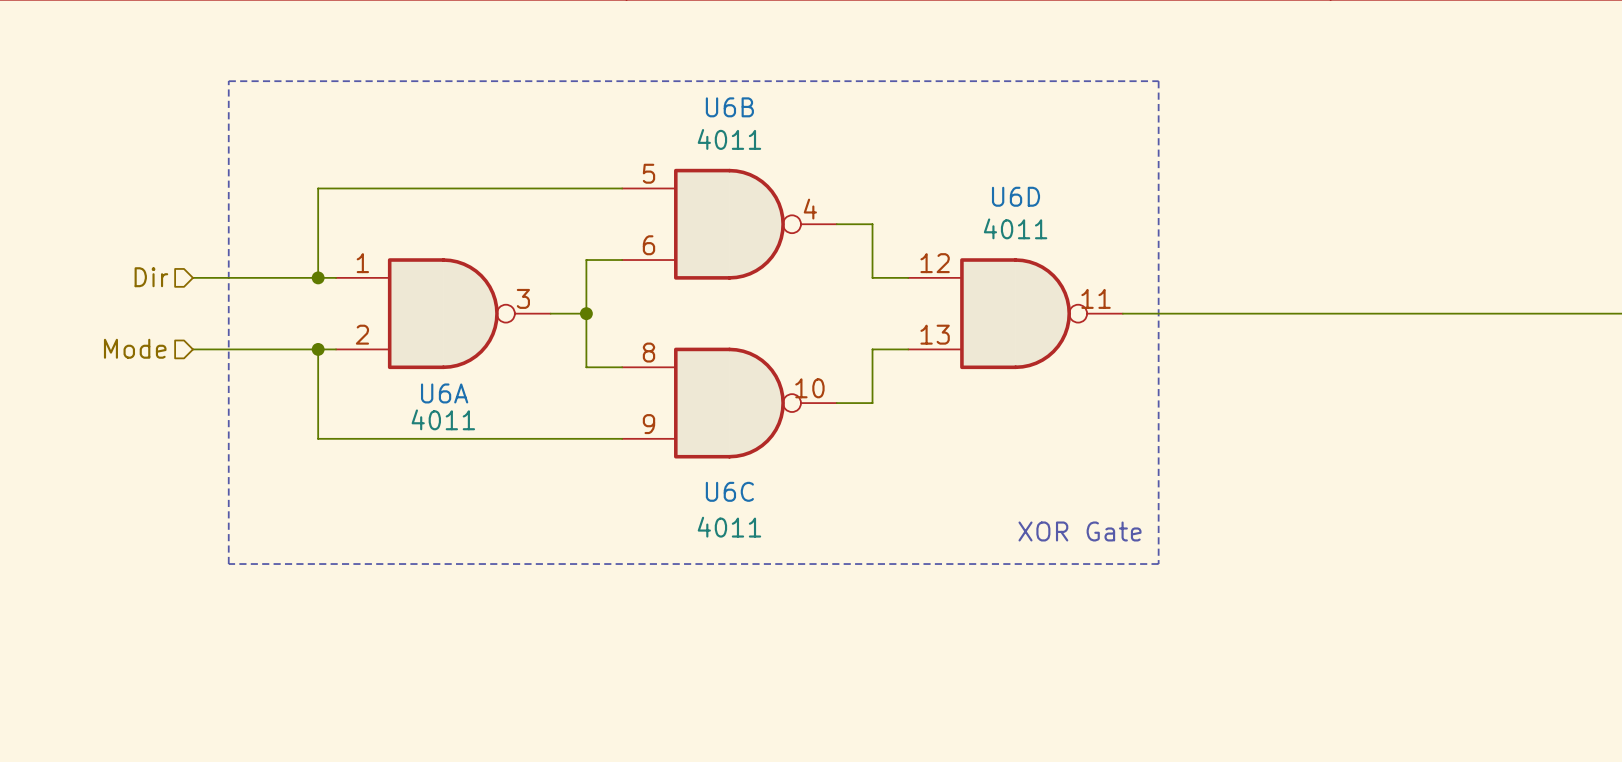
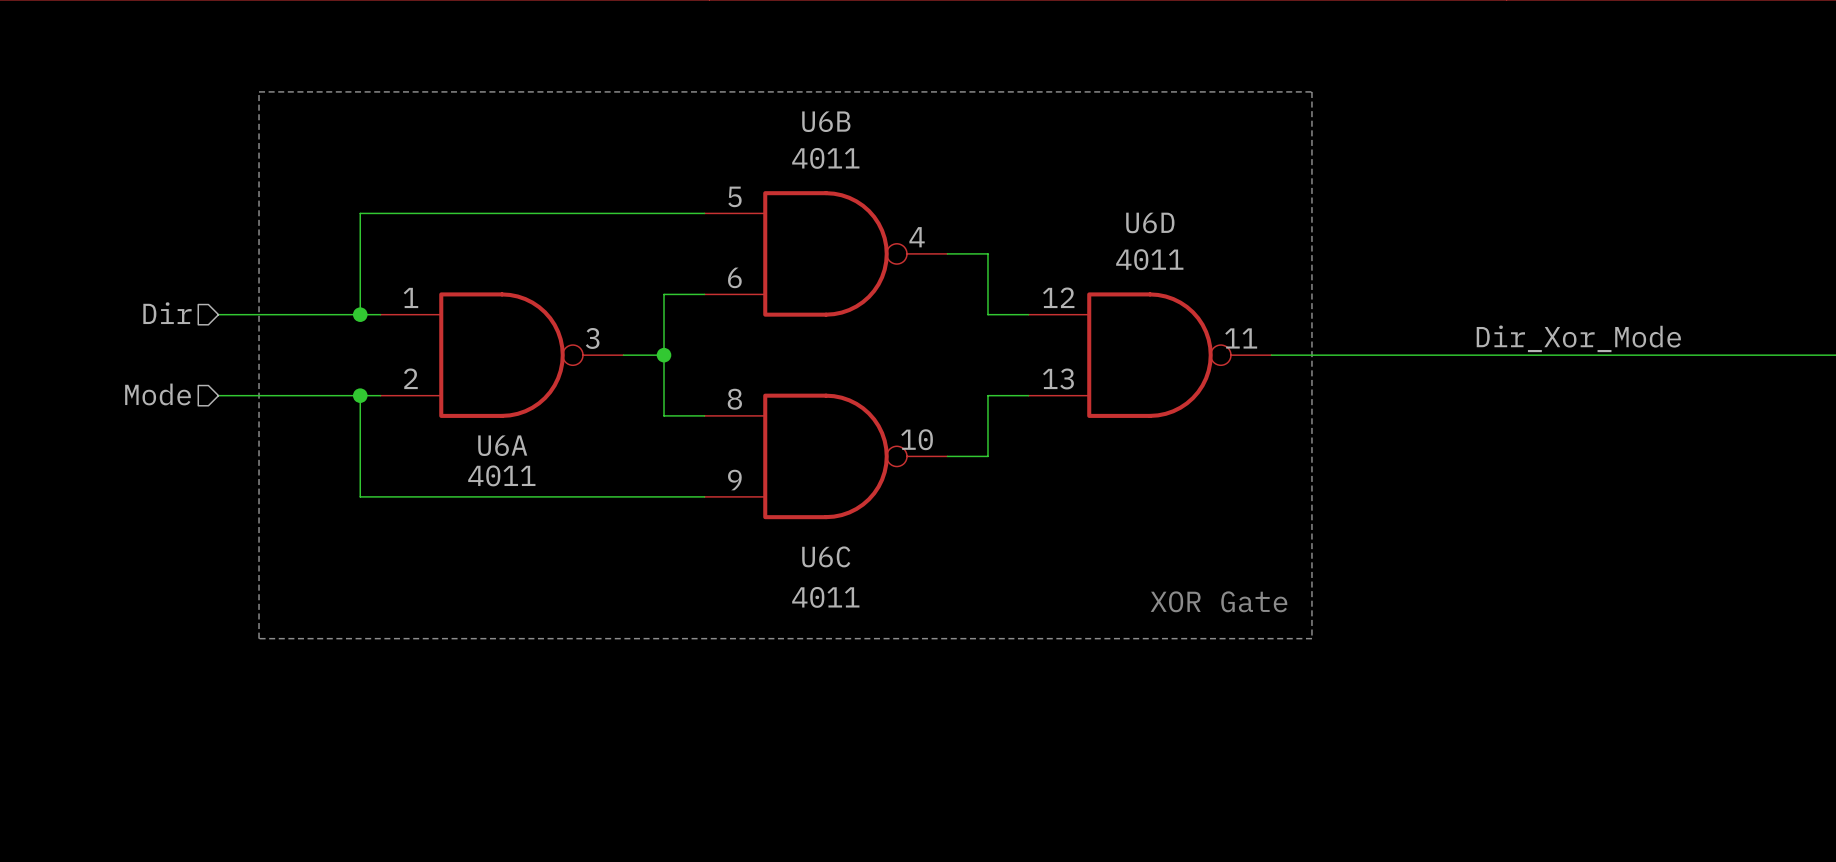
label: none -> Dir_Xor_Mode (1578, 338)

